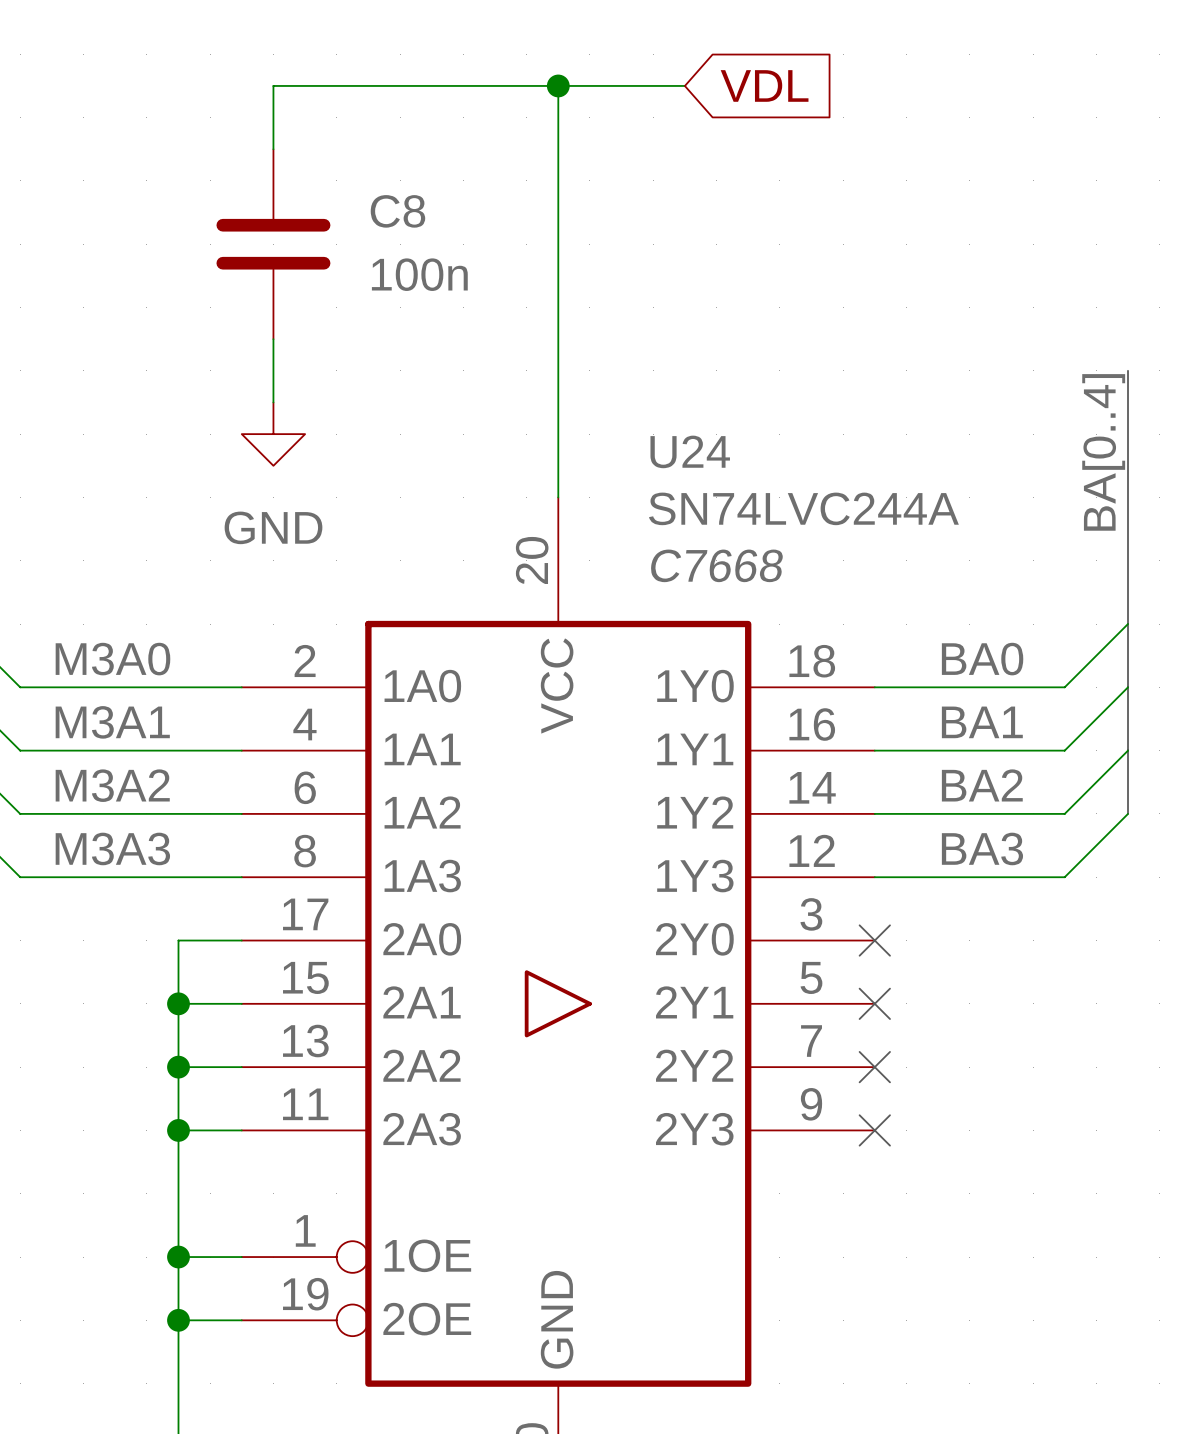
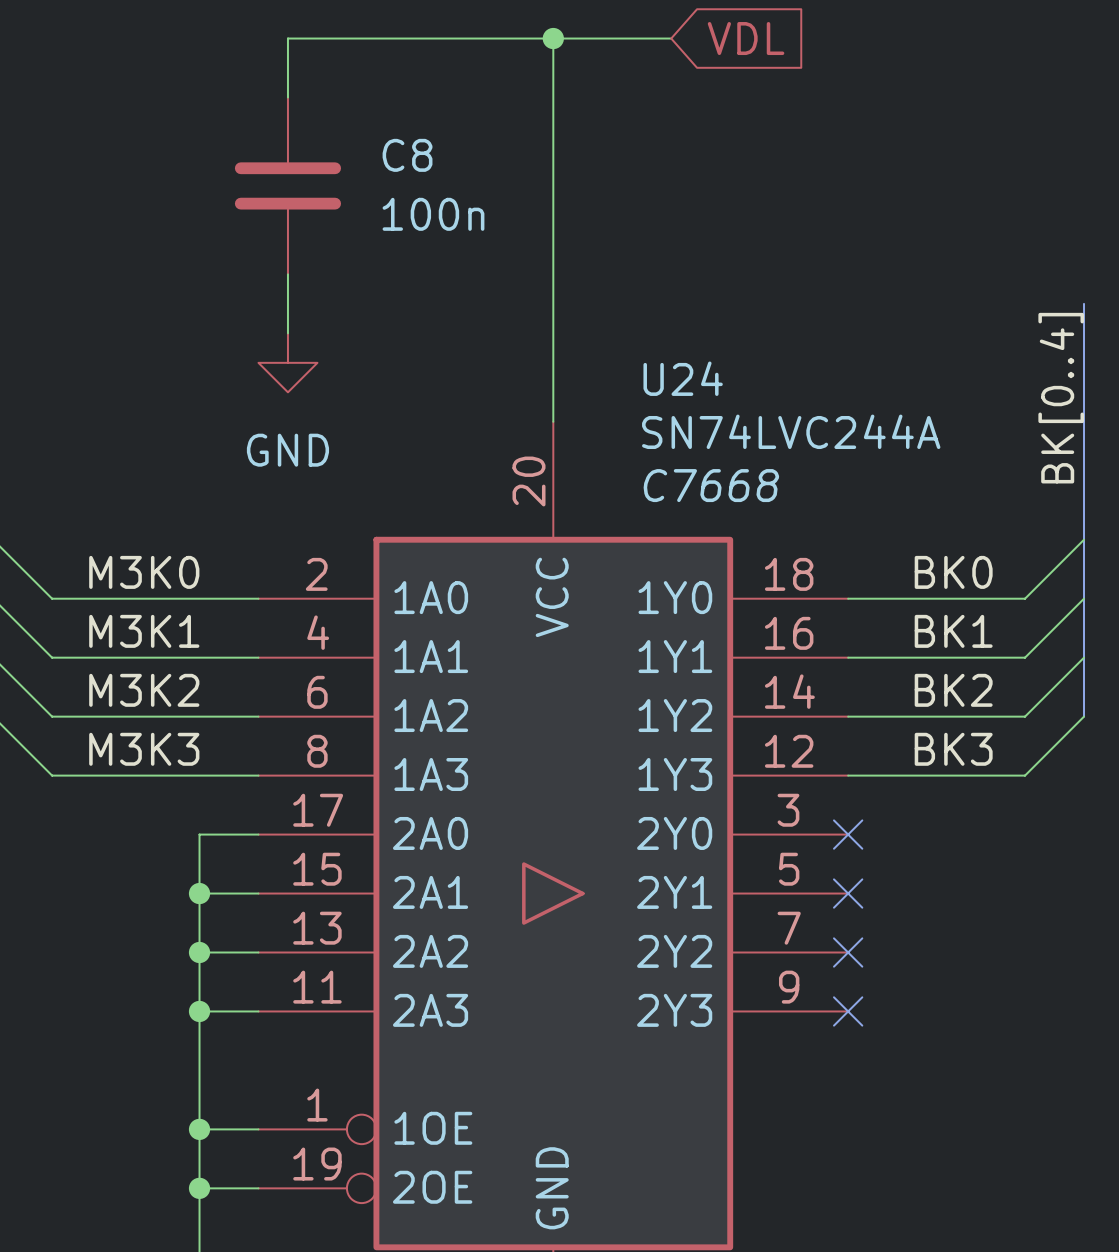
label: BA[0..4] (1103, 452) -> BK[0..4] (1061, 398)
label: M3A0 (112, 659) -> M3K0 (144, 572)
label: BA0 (982, 659) -> BK0 (953, 572)
label: M3A1 (112, 722) -> M3K1 (144, 631)
label: BA1 (982, 722) -> BK1 (953, 631)
label: M3A2 (112, 785) -> M3K2 (144, 690)
label: BA2 (982, 785) -> BK2 (953, 690)
label: M3A3 (112, 848) -> M3K3 (144, 749)
label: BA3 (982, 848) -> BK3 (953, 749)

